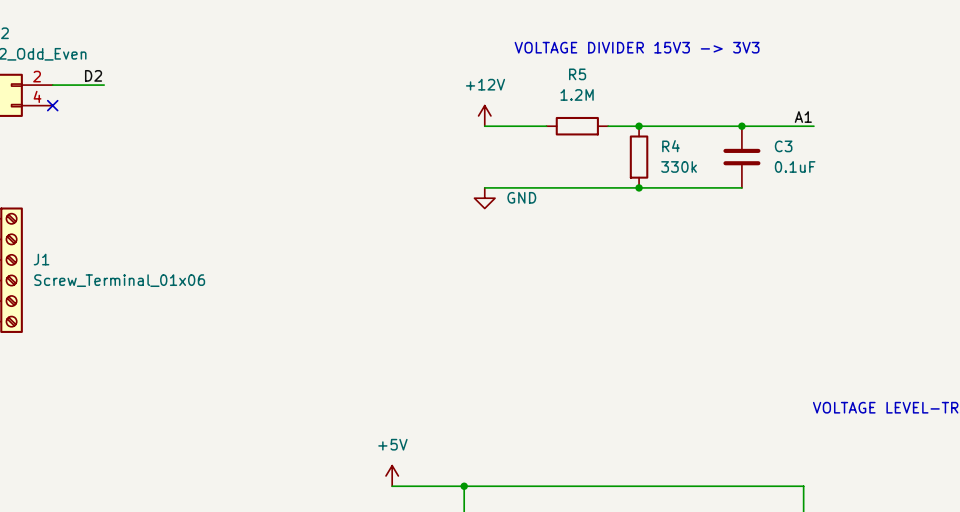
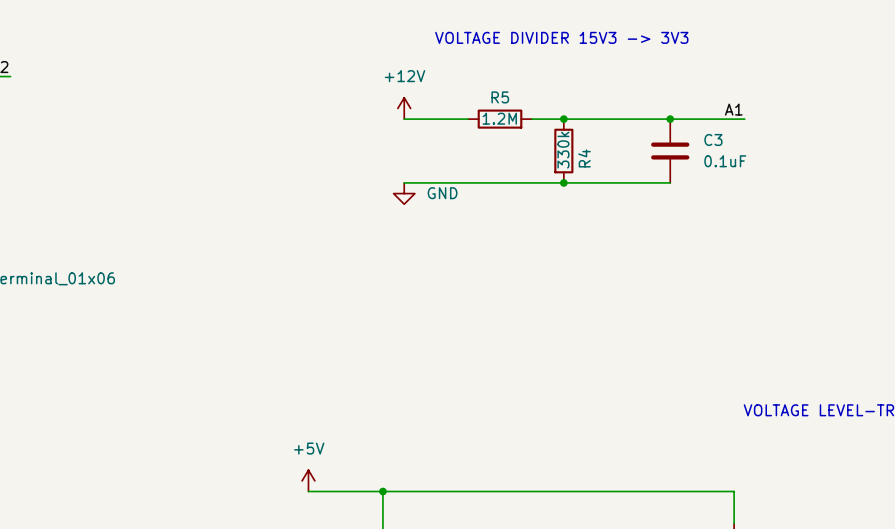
R5 name position: R5 (577, 74) -> R5 (500, 97)
R5 value position: 1.2M (577, 94) -> 1.2M (499, 118)
R4 name rotation: 0° (670, 146) -> 90° counterclockwise (584, 158)
R4 value rotation: 0° (679, 166) -> 90° counterclockwise (563, 150)
R4 value position: 330k (679, 166) -> 330k (563, 150)

